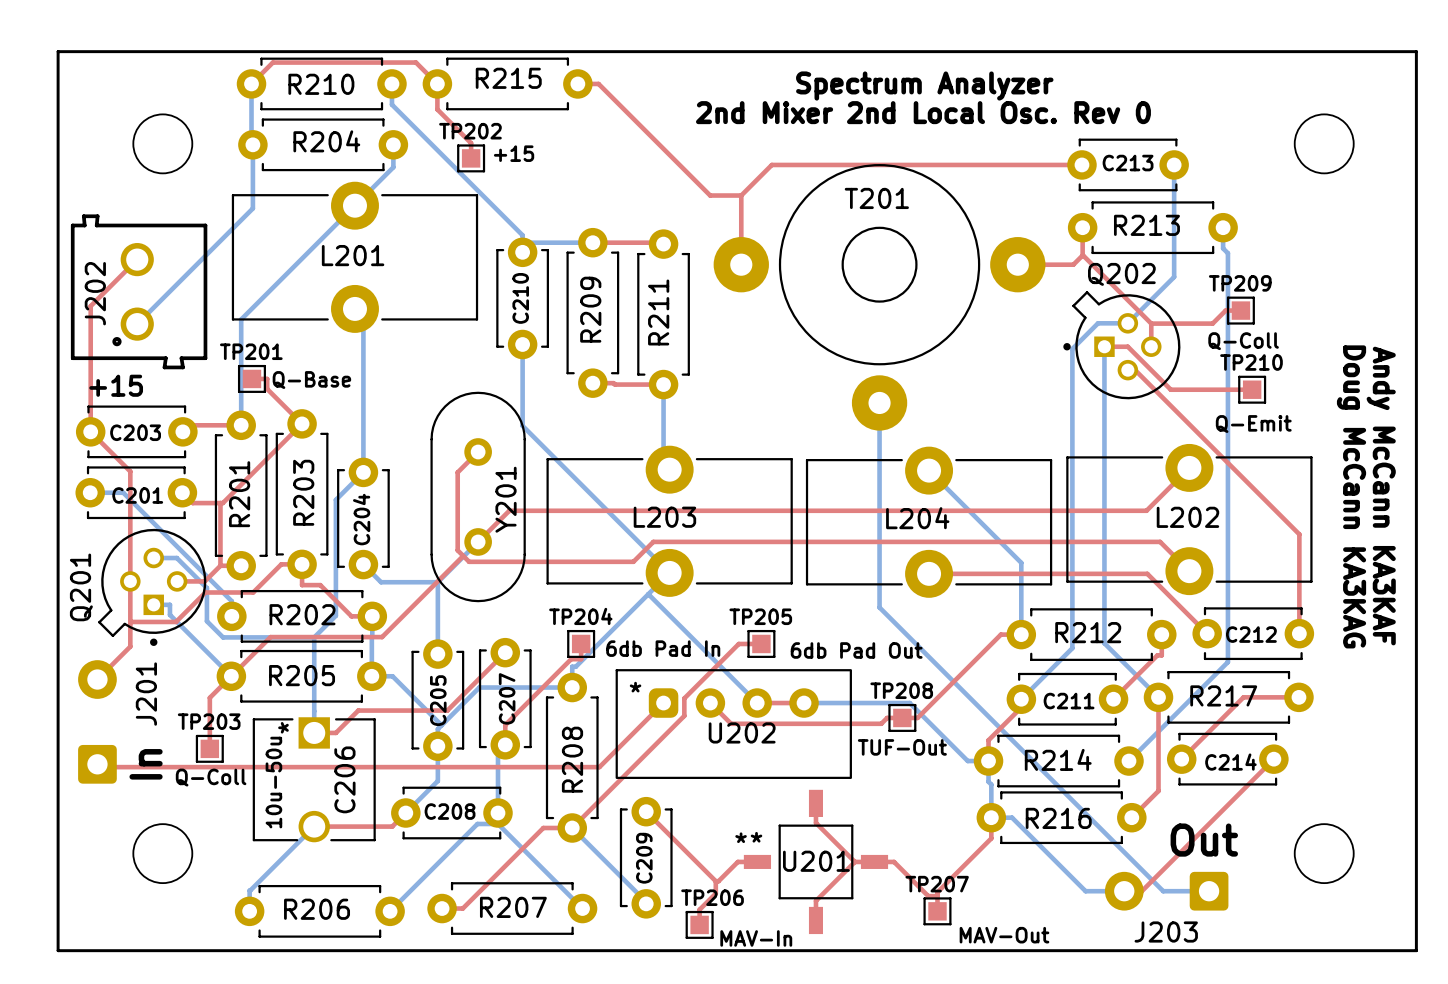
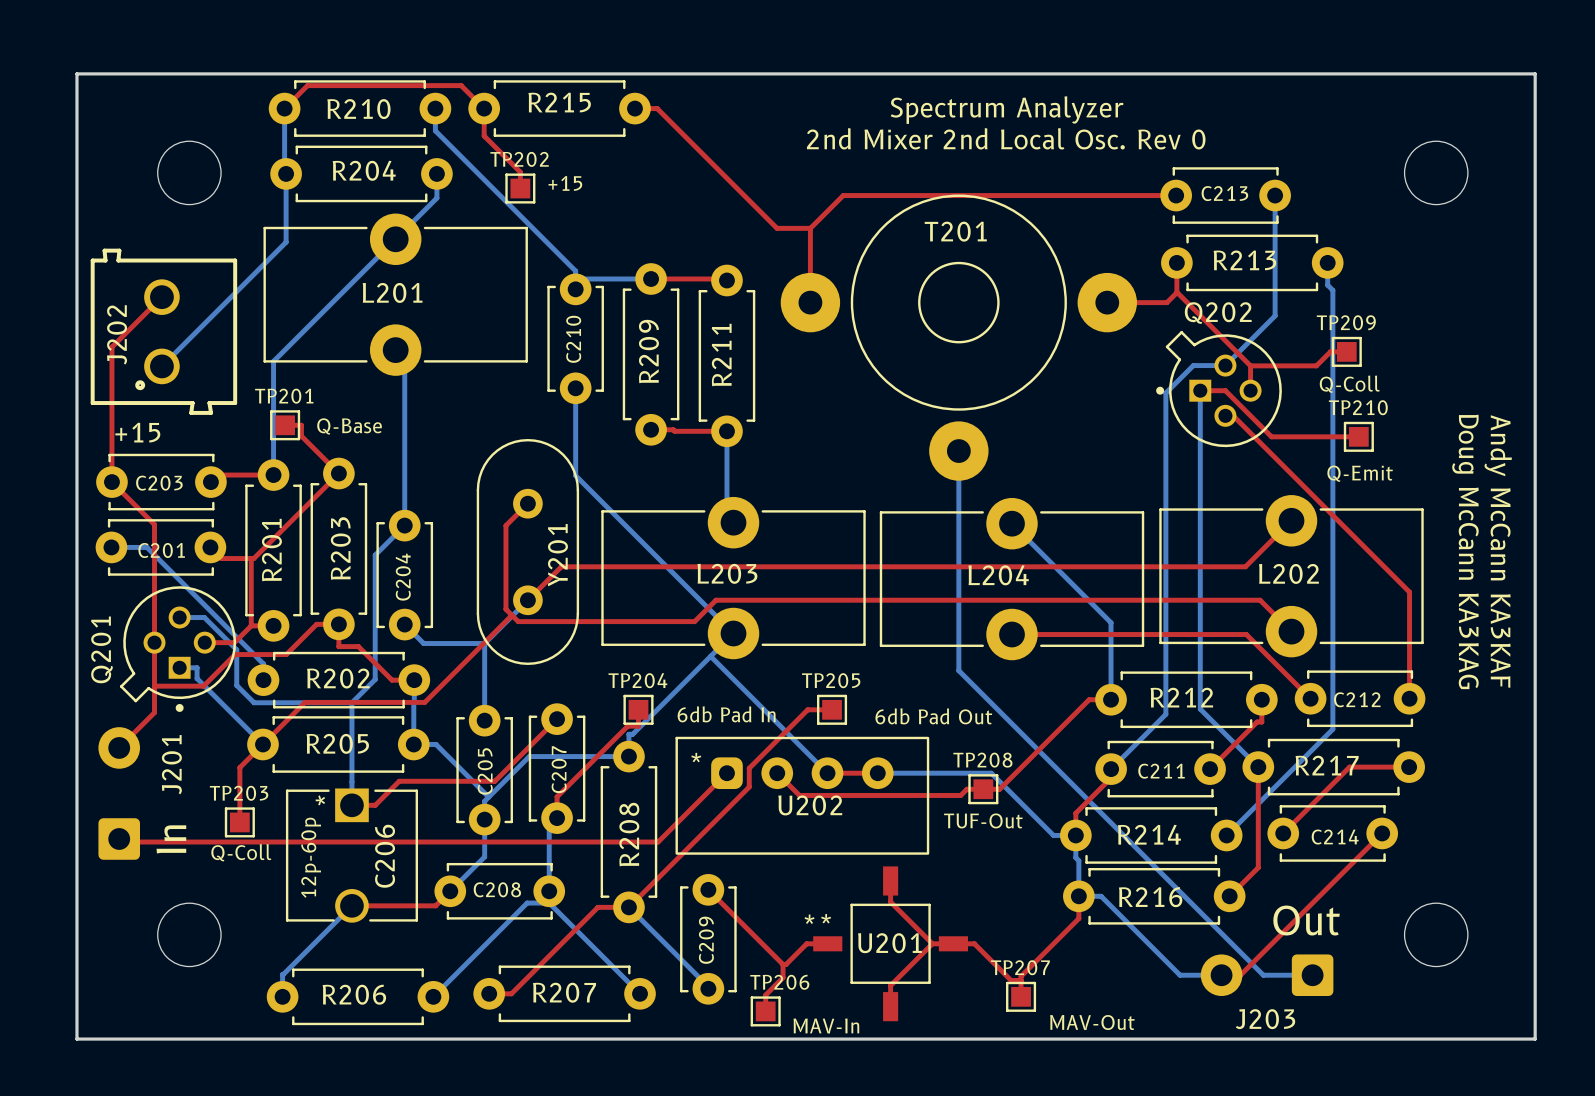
C206 value: 10u-50u (273, 782) -> 12p-60p (311, 857)

